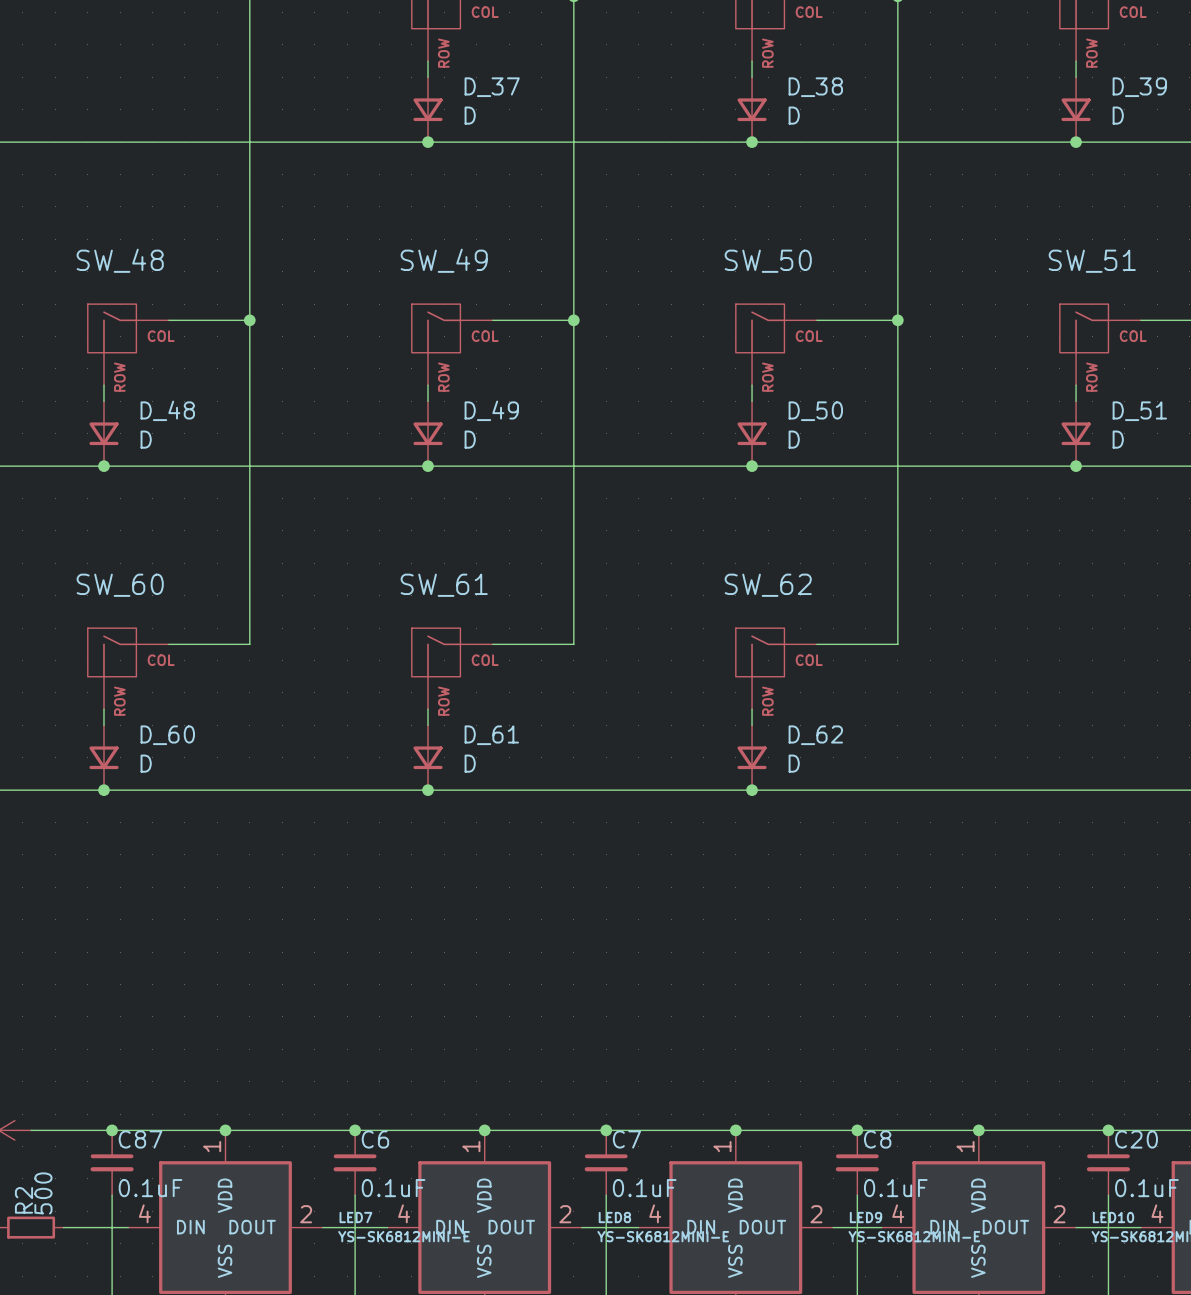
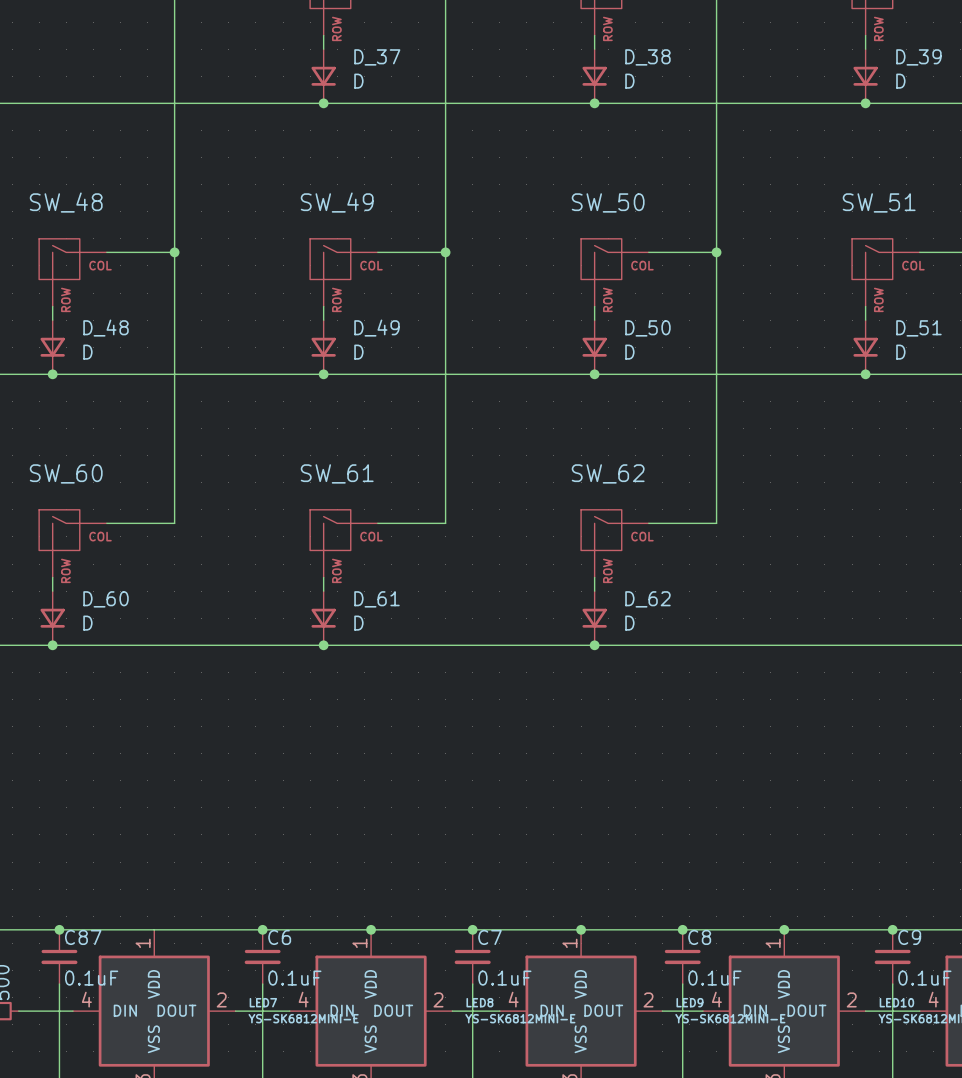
junction: (225, 1130) -> none
C20 name: C20 (1136, 1139) -> C9 (909, 937)

